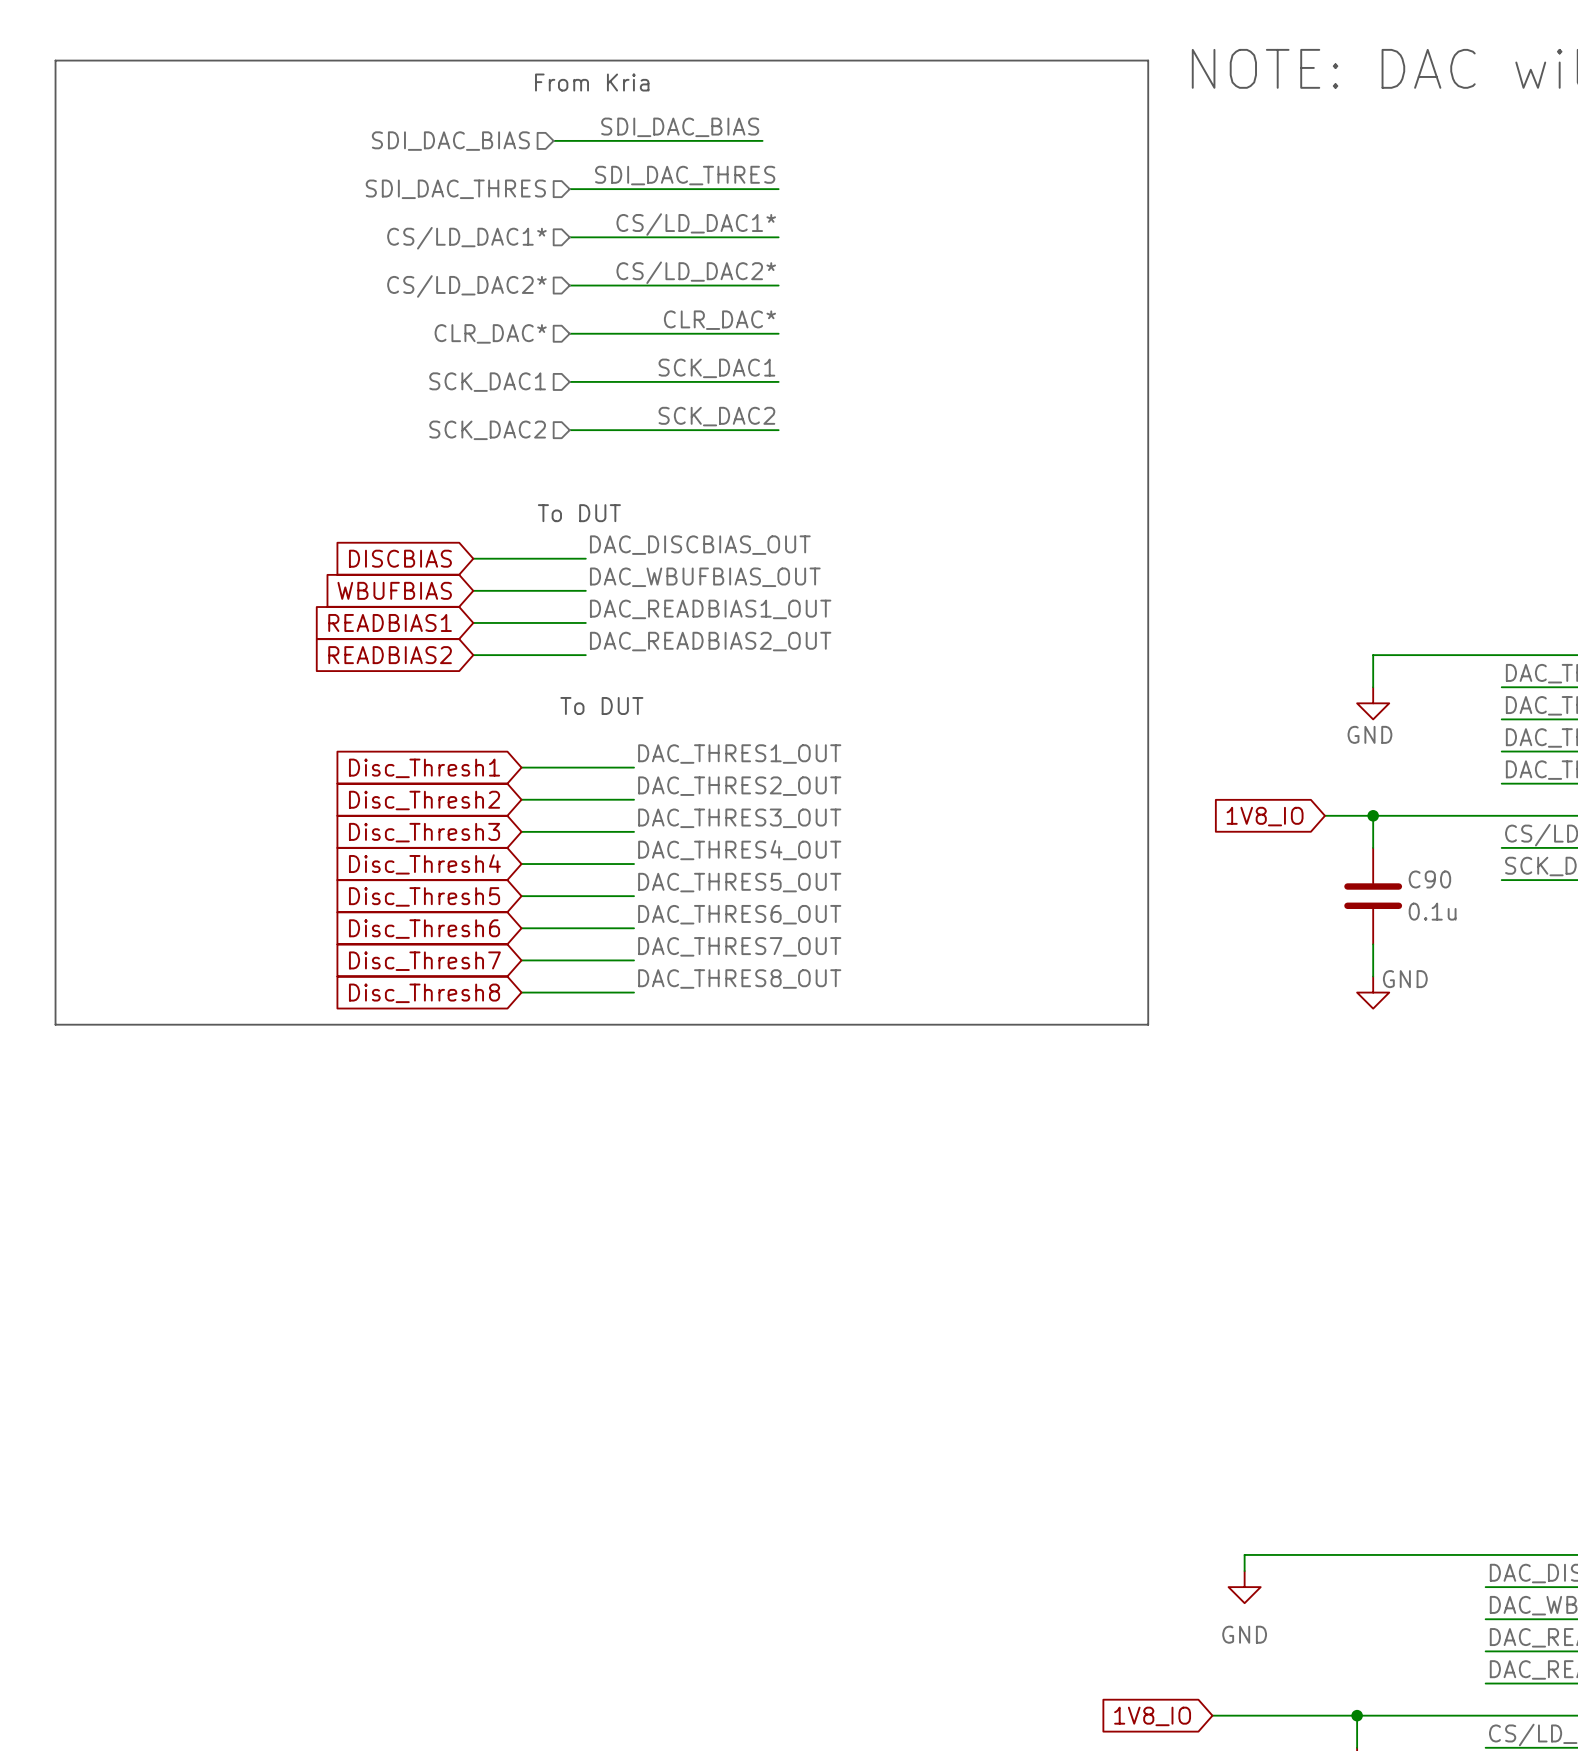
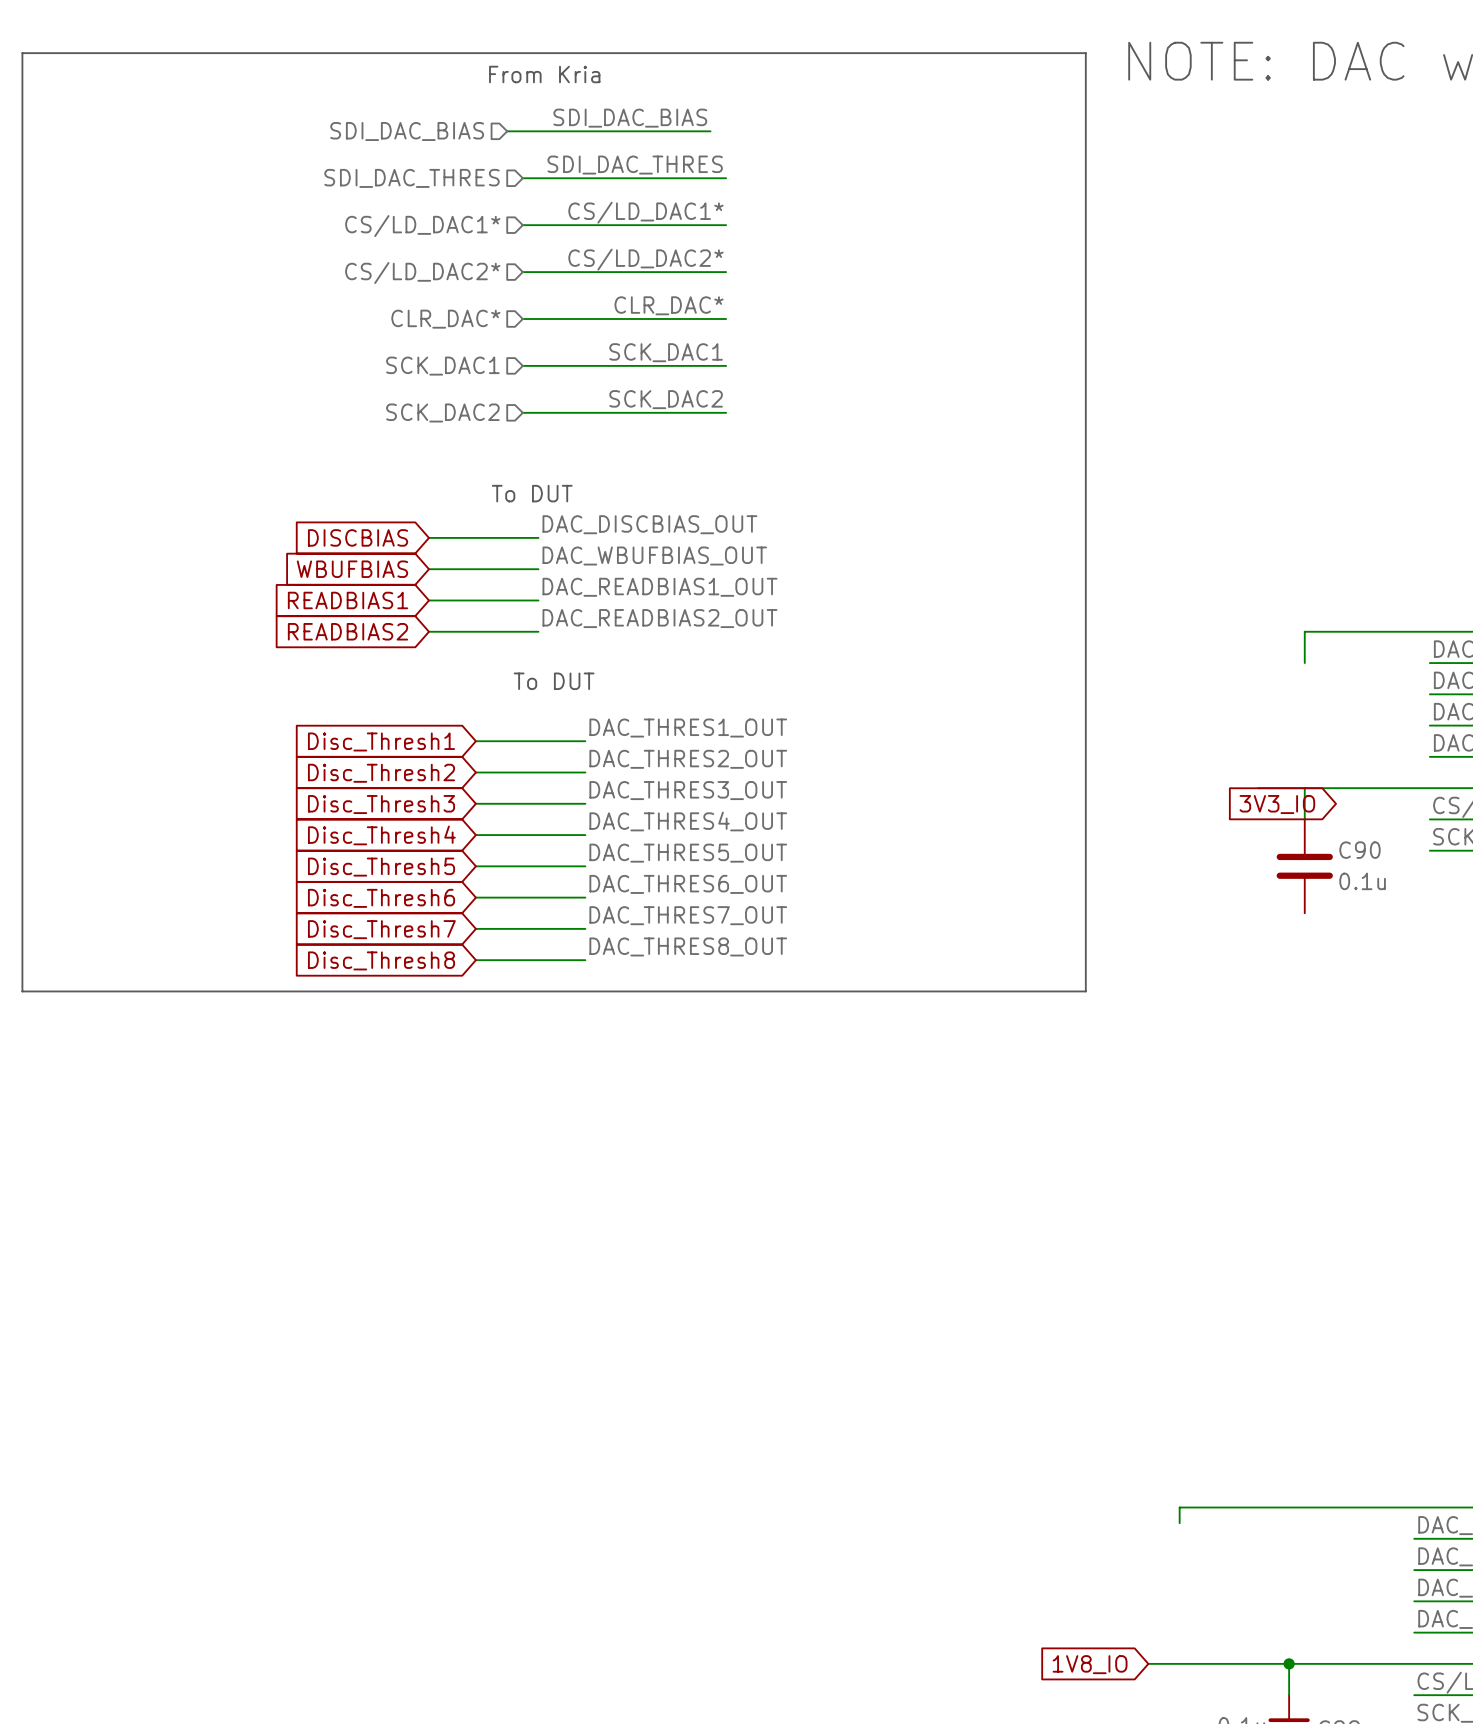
power symbol: GND (1373, 703) -> none
junction: (1373, 815) -> none
global label: 1V8_IO (1265, 816) -> 3V3_IO (1277, 804)
wire: (1373, 944) (1373, 976) -> none
power symbol: GND (1373, 992) -> none
power symbol: GND (1244, 1587) -> none

